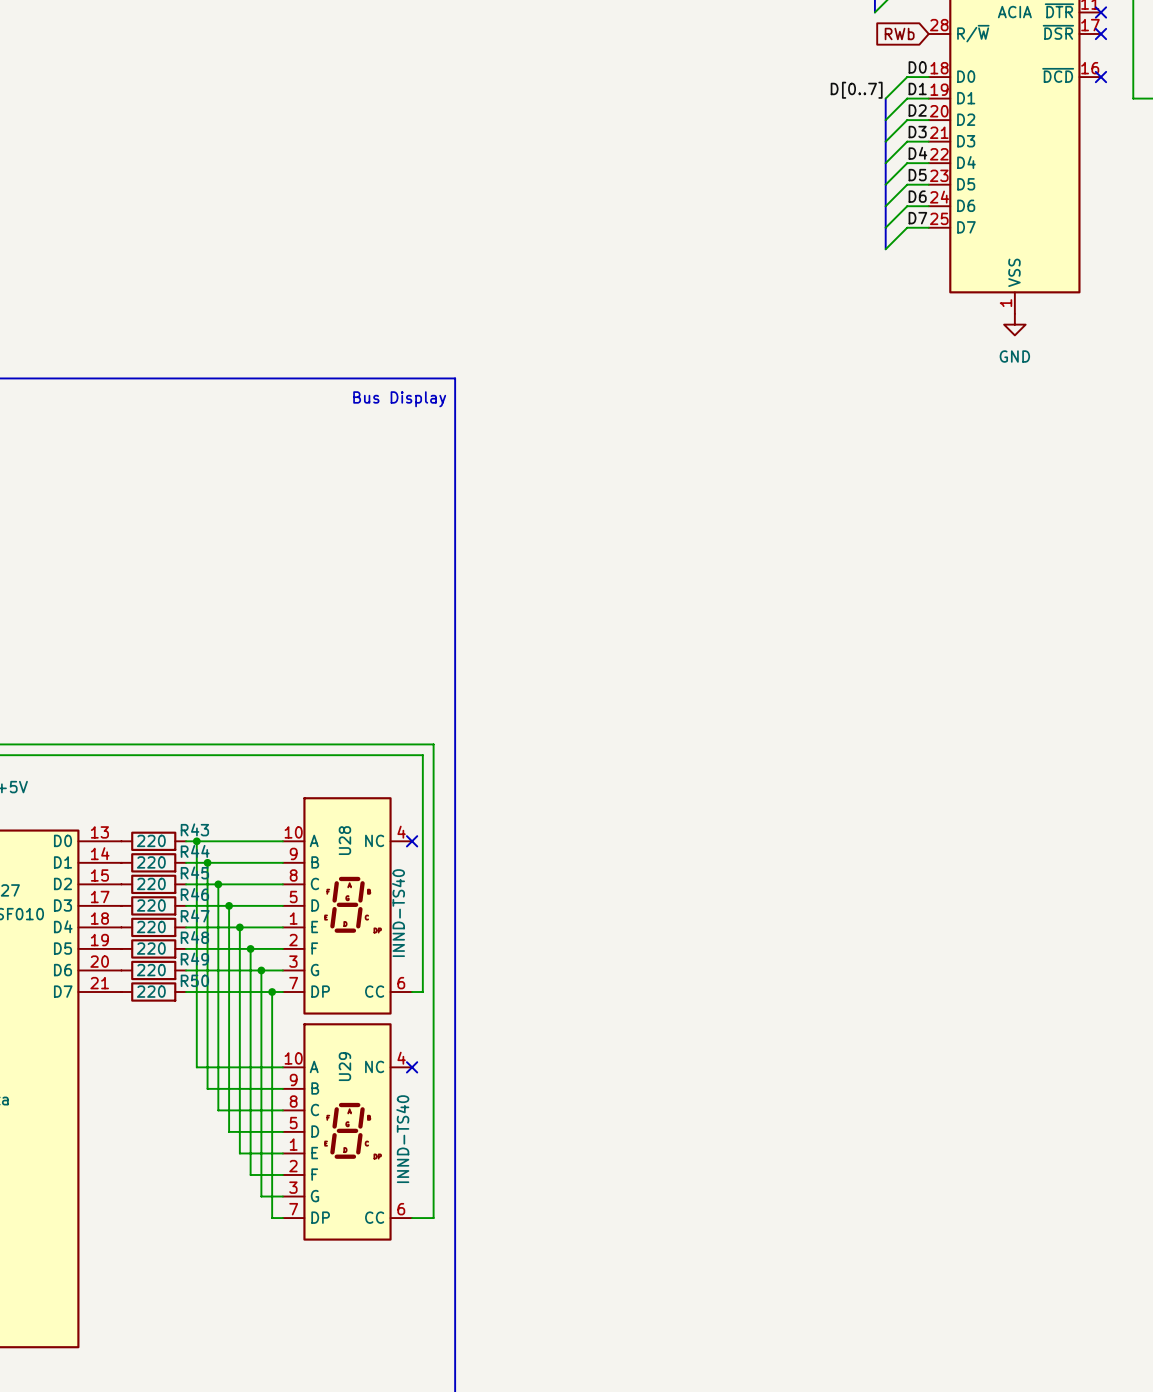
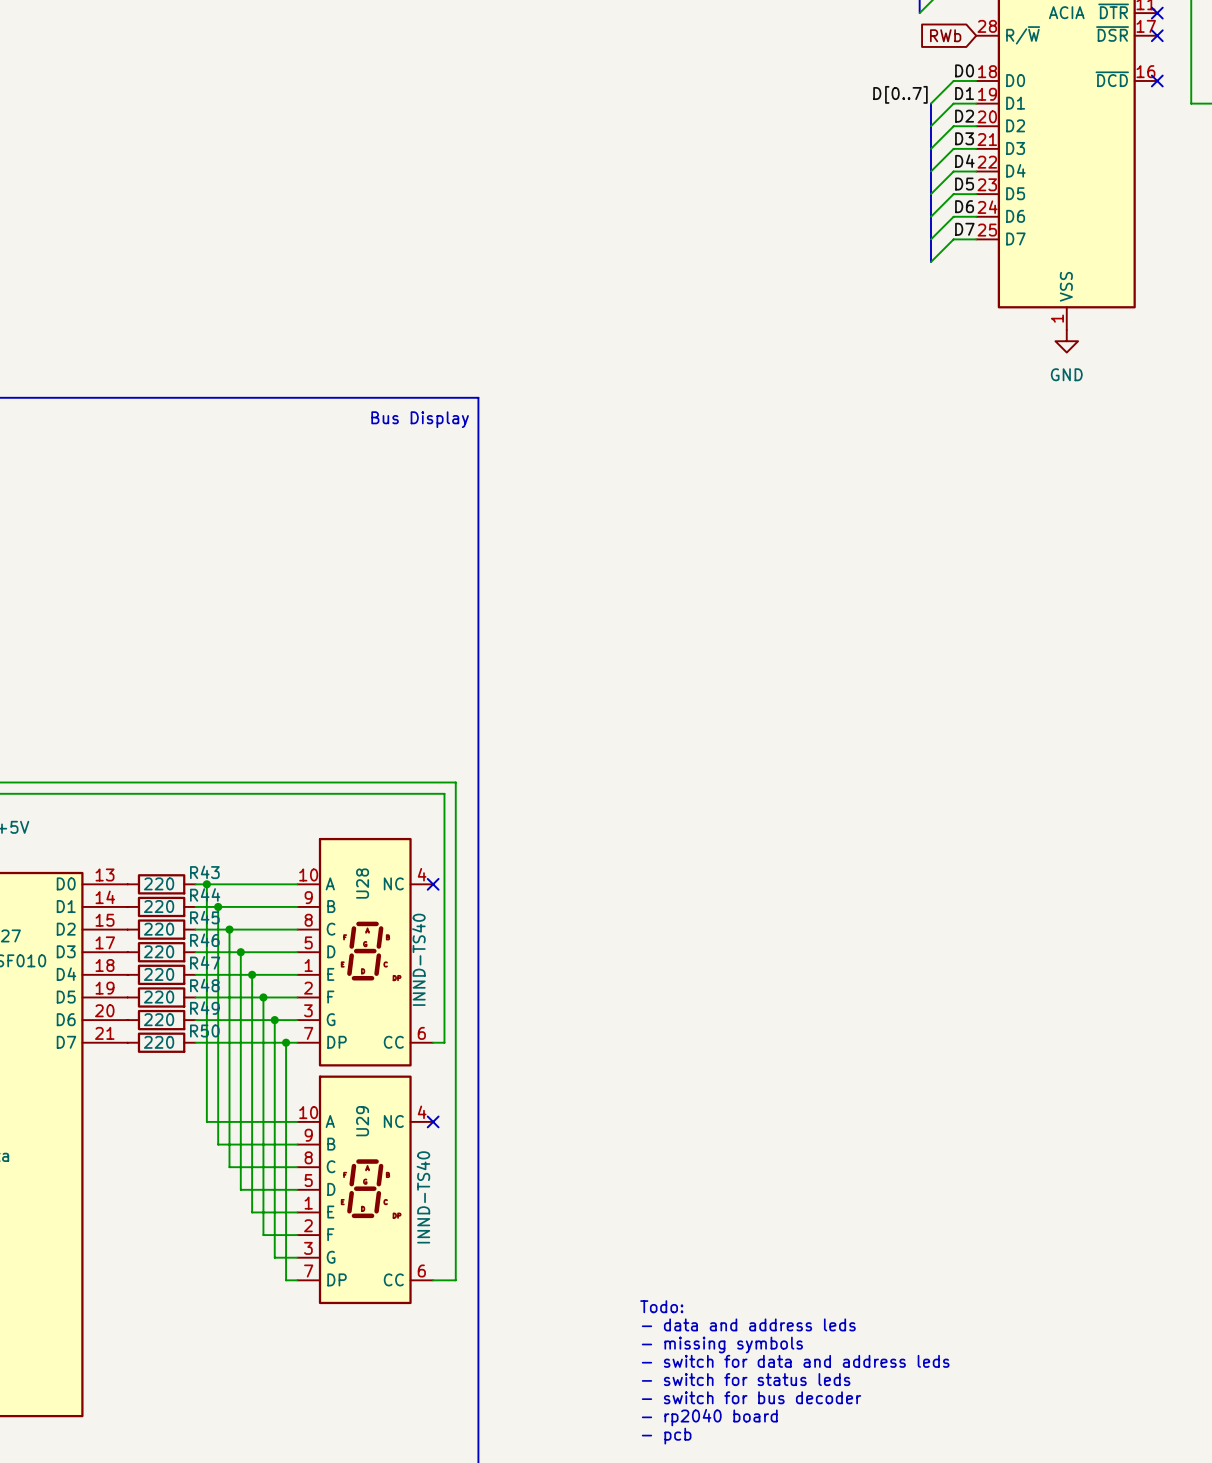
text: none -> Todo: (661, 1306)
text: none -> - data and address leds (748, 1324)
text: none -> - missing symbols (722, 1345)
text: none -> - switch for data and address leds (795, 1361)
text: none -> - switch for status leds (746, 1379)
text: none -> - switch for bus decoder (751, 1397)
text: none -> - rp2040 board (709, 1417)
text: none -> - pcb (666, 1436)

